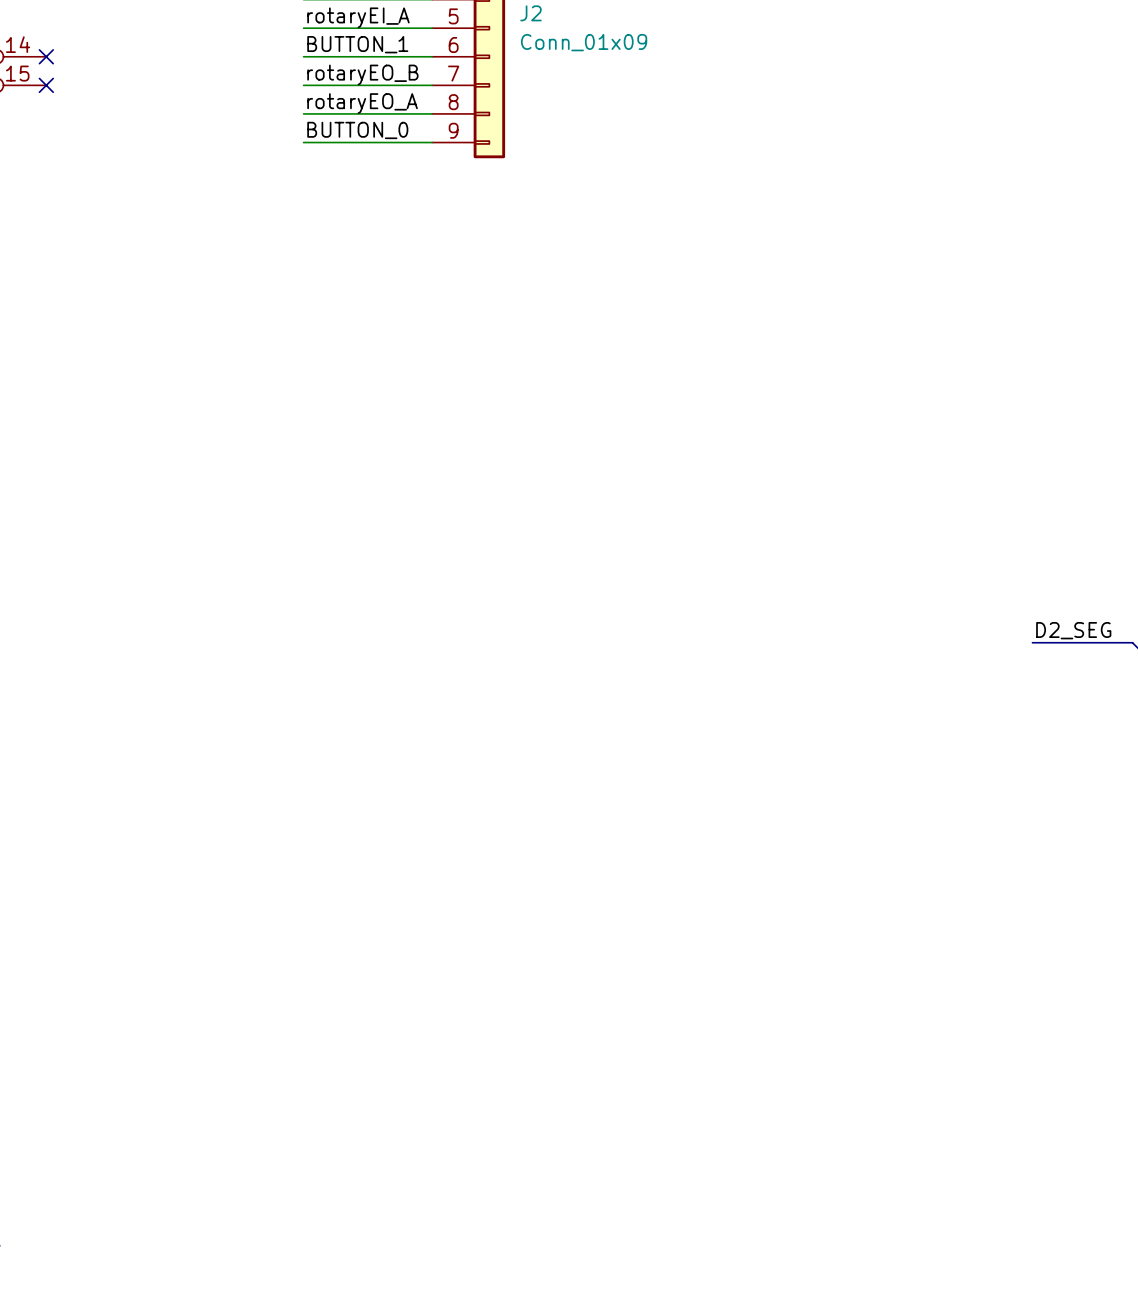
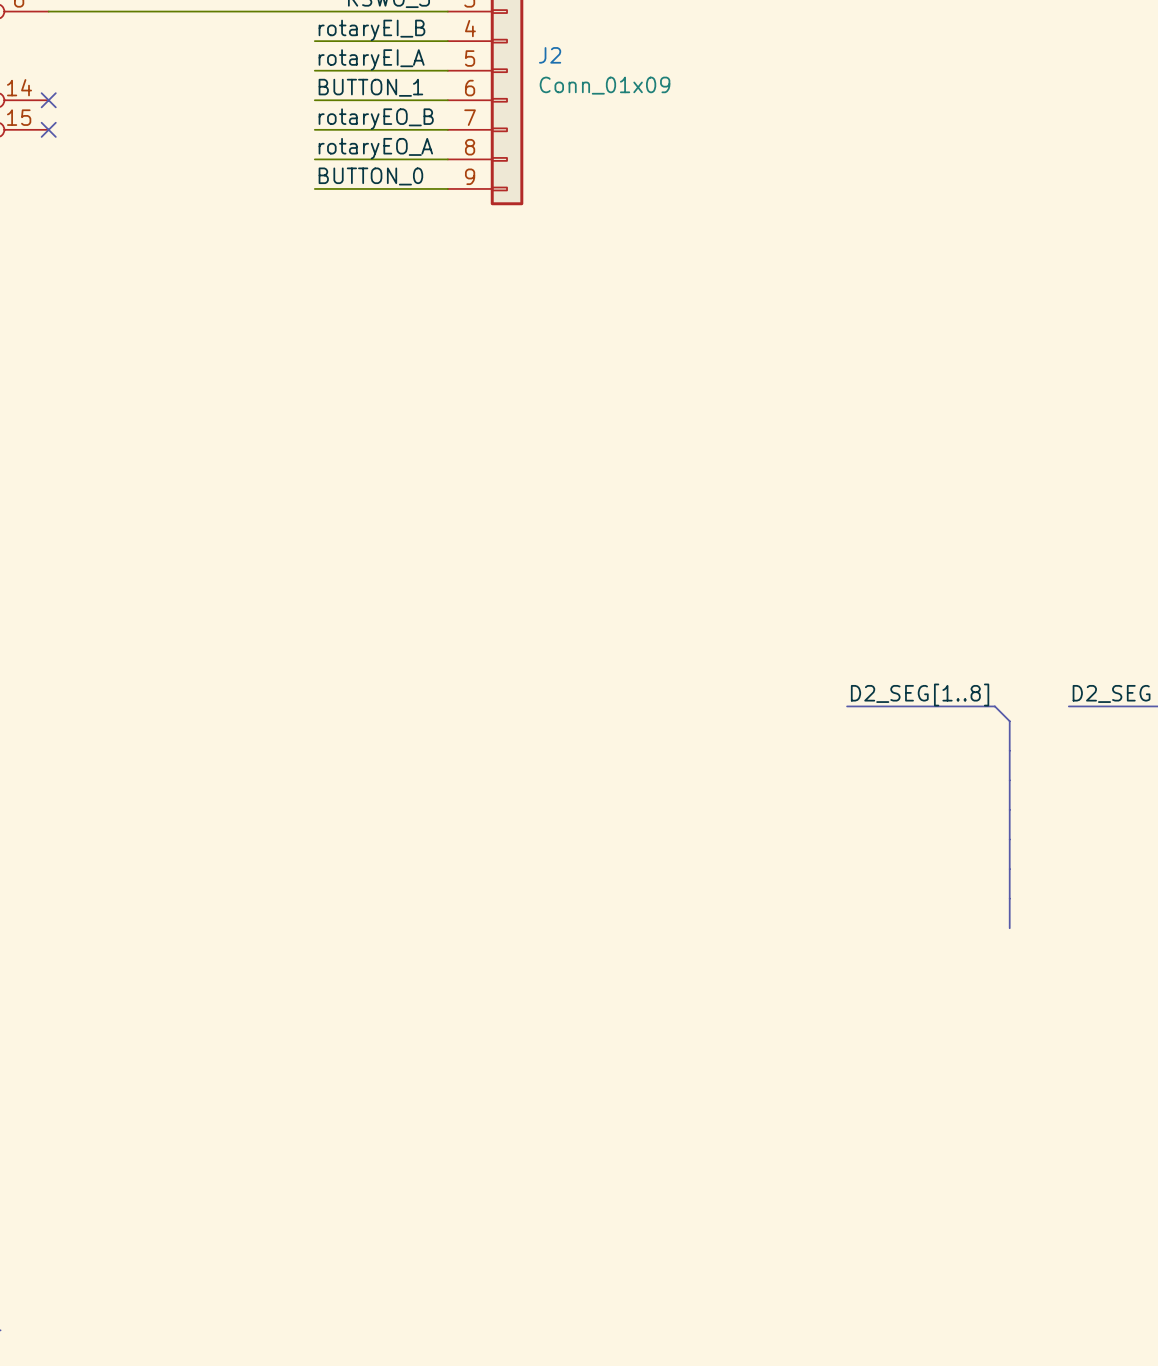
label: none -> D2_SEG[1..8] (920, 695)
bus: none -> (847, 706) (994, 706) (1009, 721) (1009, 928)

